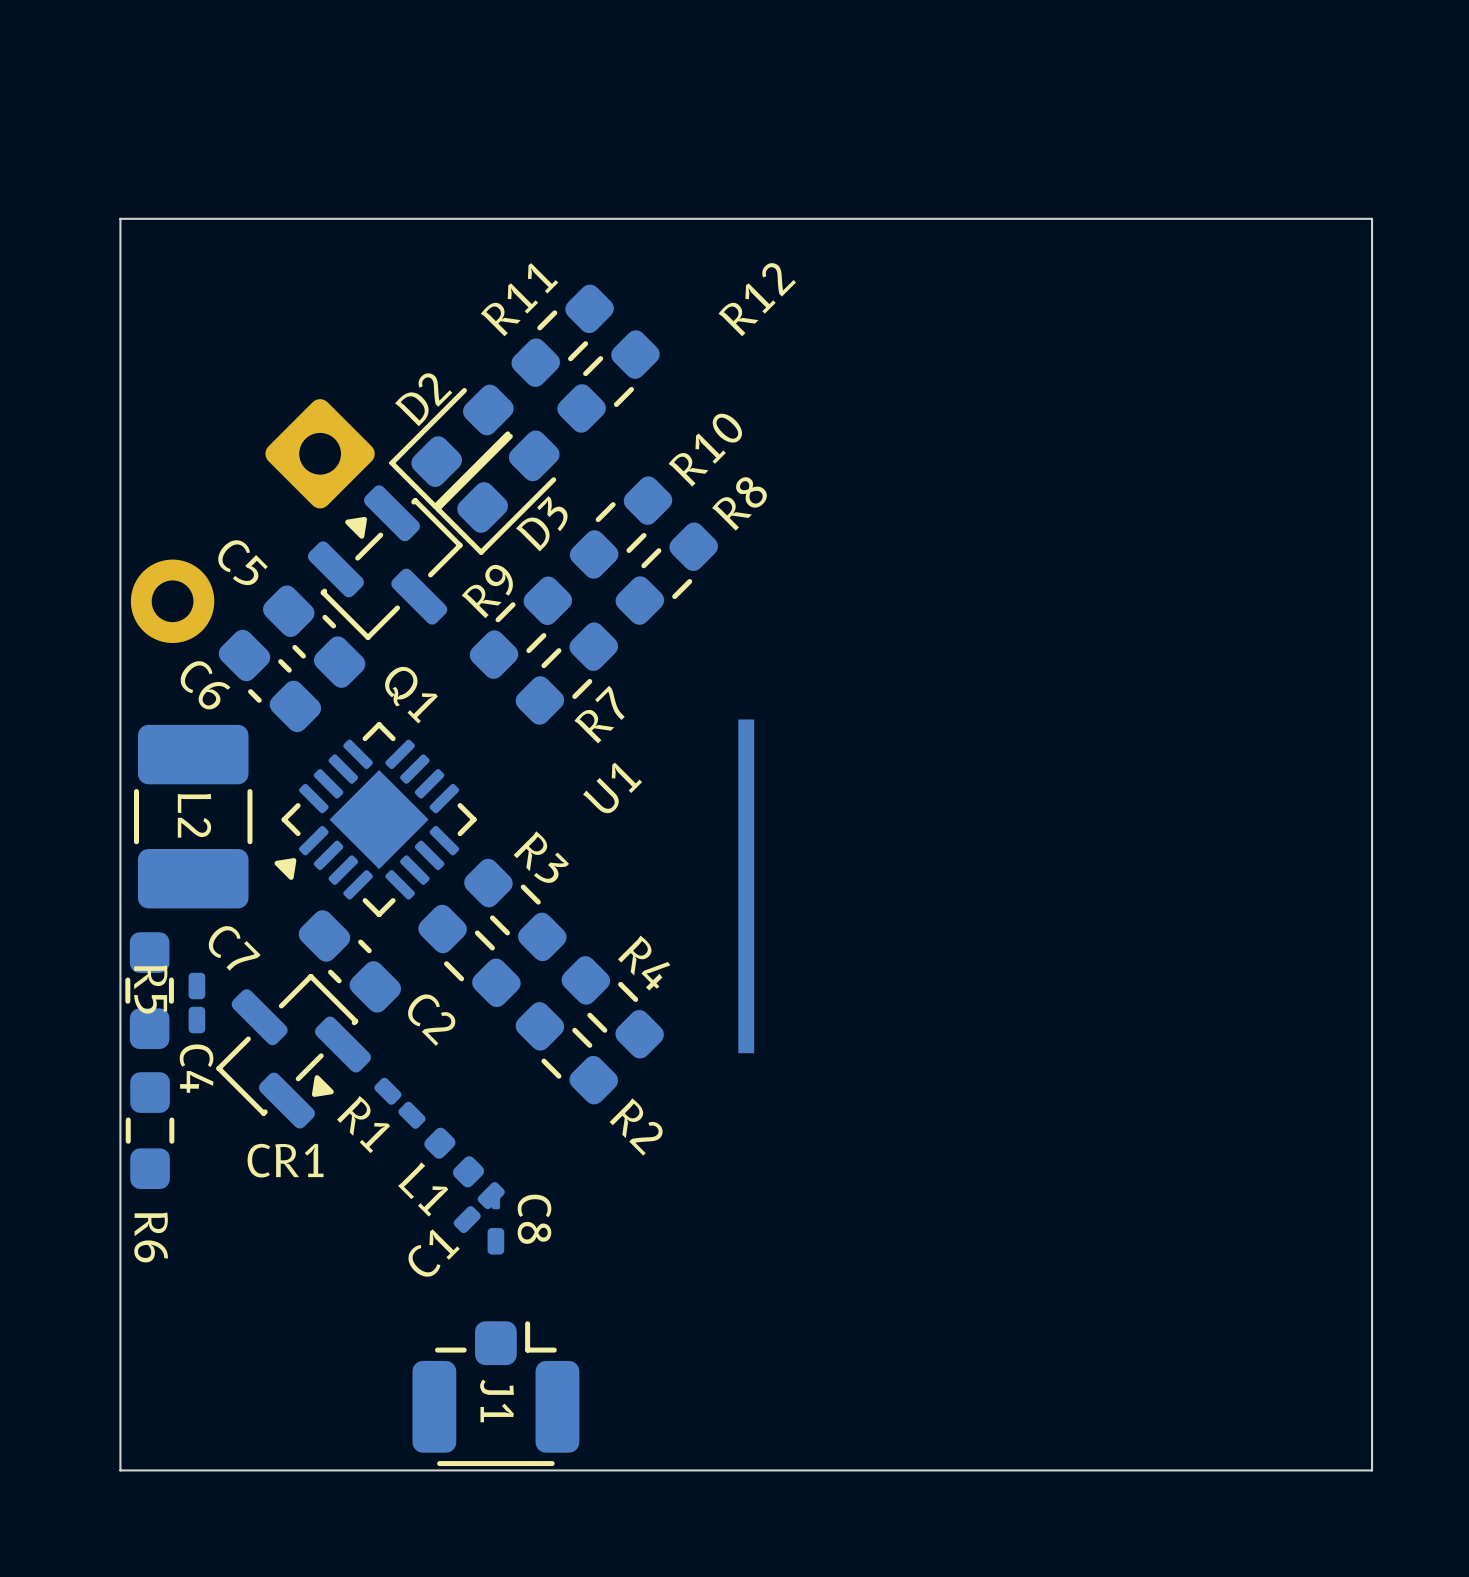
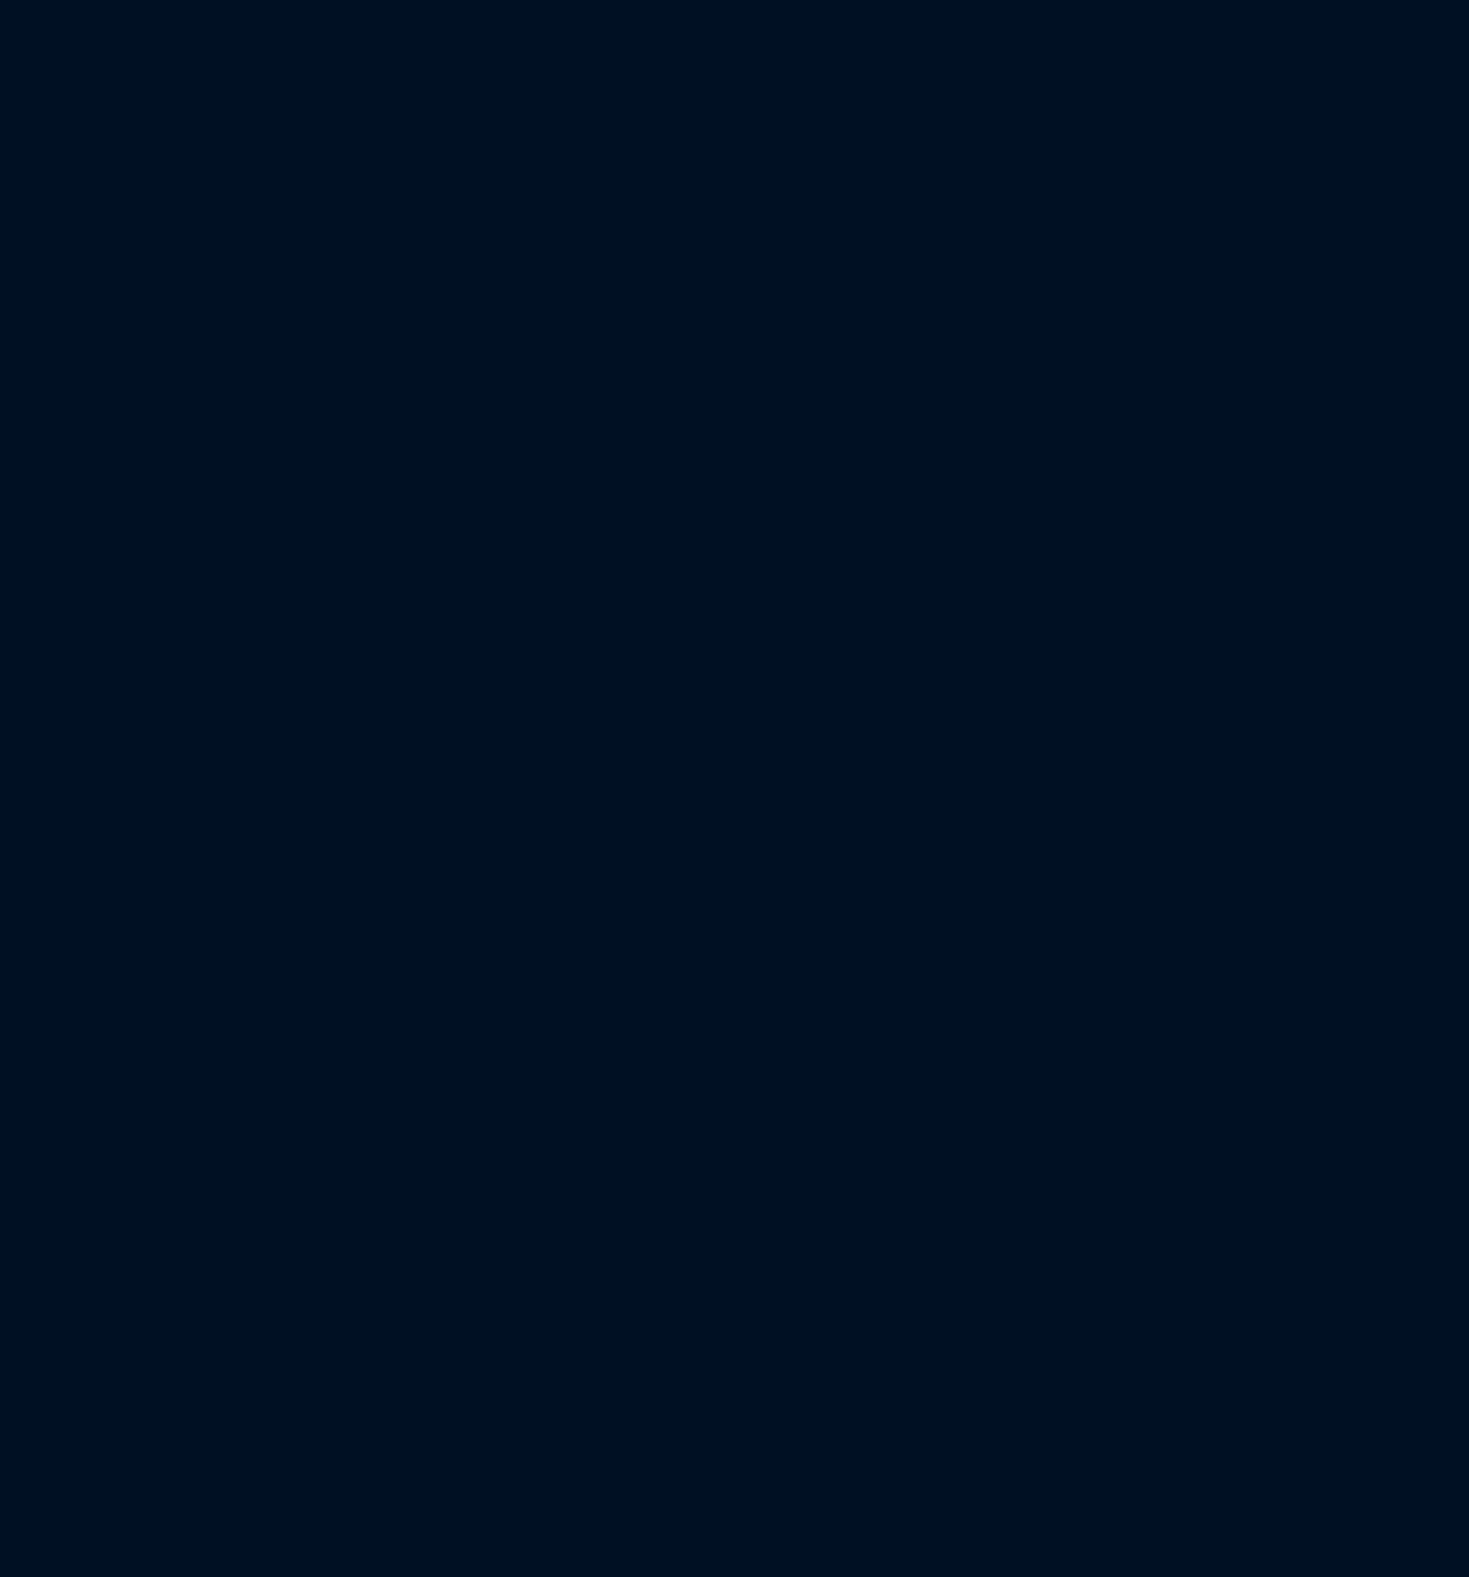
board edge: (1372, 218) (120, 218) (120, 1470) (1372, 1470) (1372, 218) -> none
R11: (562, 335) -> none
R12: (608, 381) -> none
D2: (451, 446) -> none
D3: (497, 492) -> none
part: (252, 521) -> none
R10: (621, 527) -> none
Q1: (385, 562) -> none
R8: (666, 573) -> none
R9: (520, 627) -> none
C5: (314, 636) -> none
R7: (566, 673) -> none
C6: (269, 680) -> none
L2: (193, 816) -> none
U1: (375, 819) -> none
part: (746, 886) -> none
R3: (515, 909) -> none
R1: (469, 955) -> none
C7: (349, 961) -> none
R5: (149, 990) -> none
C4: (196, 1003) -> none
R4: (612, 1007) -> none
CR1: (293, 1051) -> none
R2: (566, 1053) -> none
C2: (399, 1103) -> none
R6: (150, 1130) -> none
L1: (454, 1157) -> none
C1: (479, 1207) -> none
C8: (495, 1225) -> none
J1: (495, 1393) -> none

